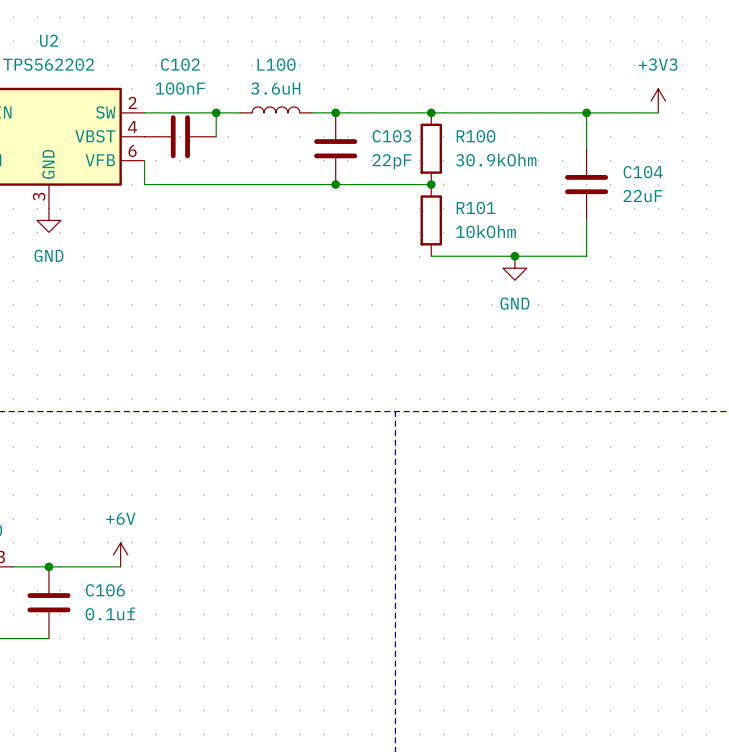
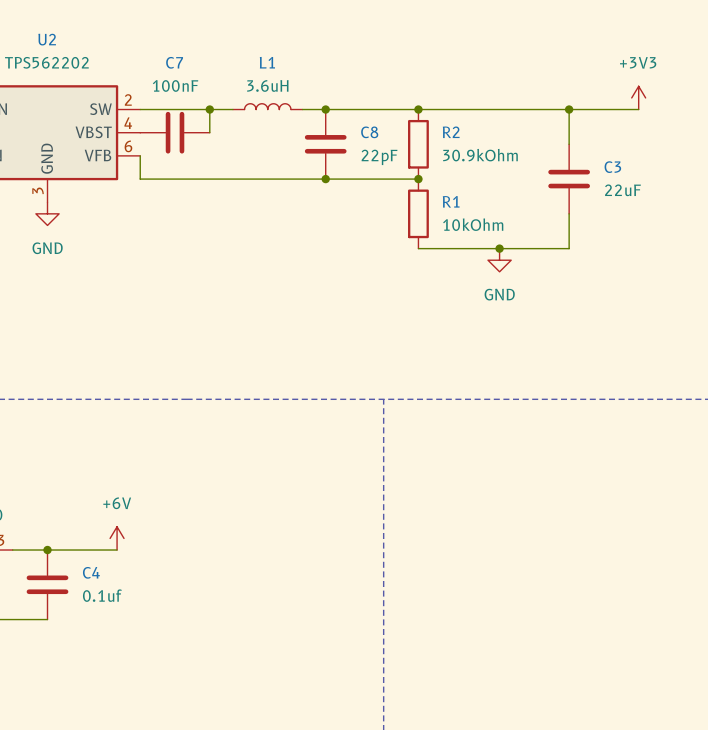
C102 name: C102 (180, 64) -> C7 (174, 62)
L100 name: L100 (276, 64) -> L1 (267, 62)
C103 name: C103 (391, 136) -> C8 (369, 132)
R100 name: R100 (476, 136) -> R2 (451, 132)
C104 name: C104 (643, 172) -> C3 (612, 167)
R101 name: R101 (476, 208) -> R1 (451, 201)
C106 name: C106 (105, 590) -> C4 (91, 572)

